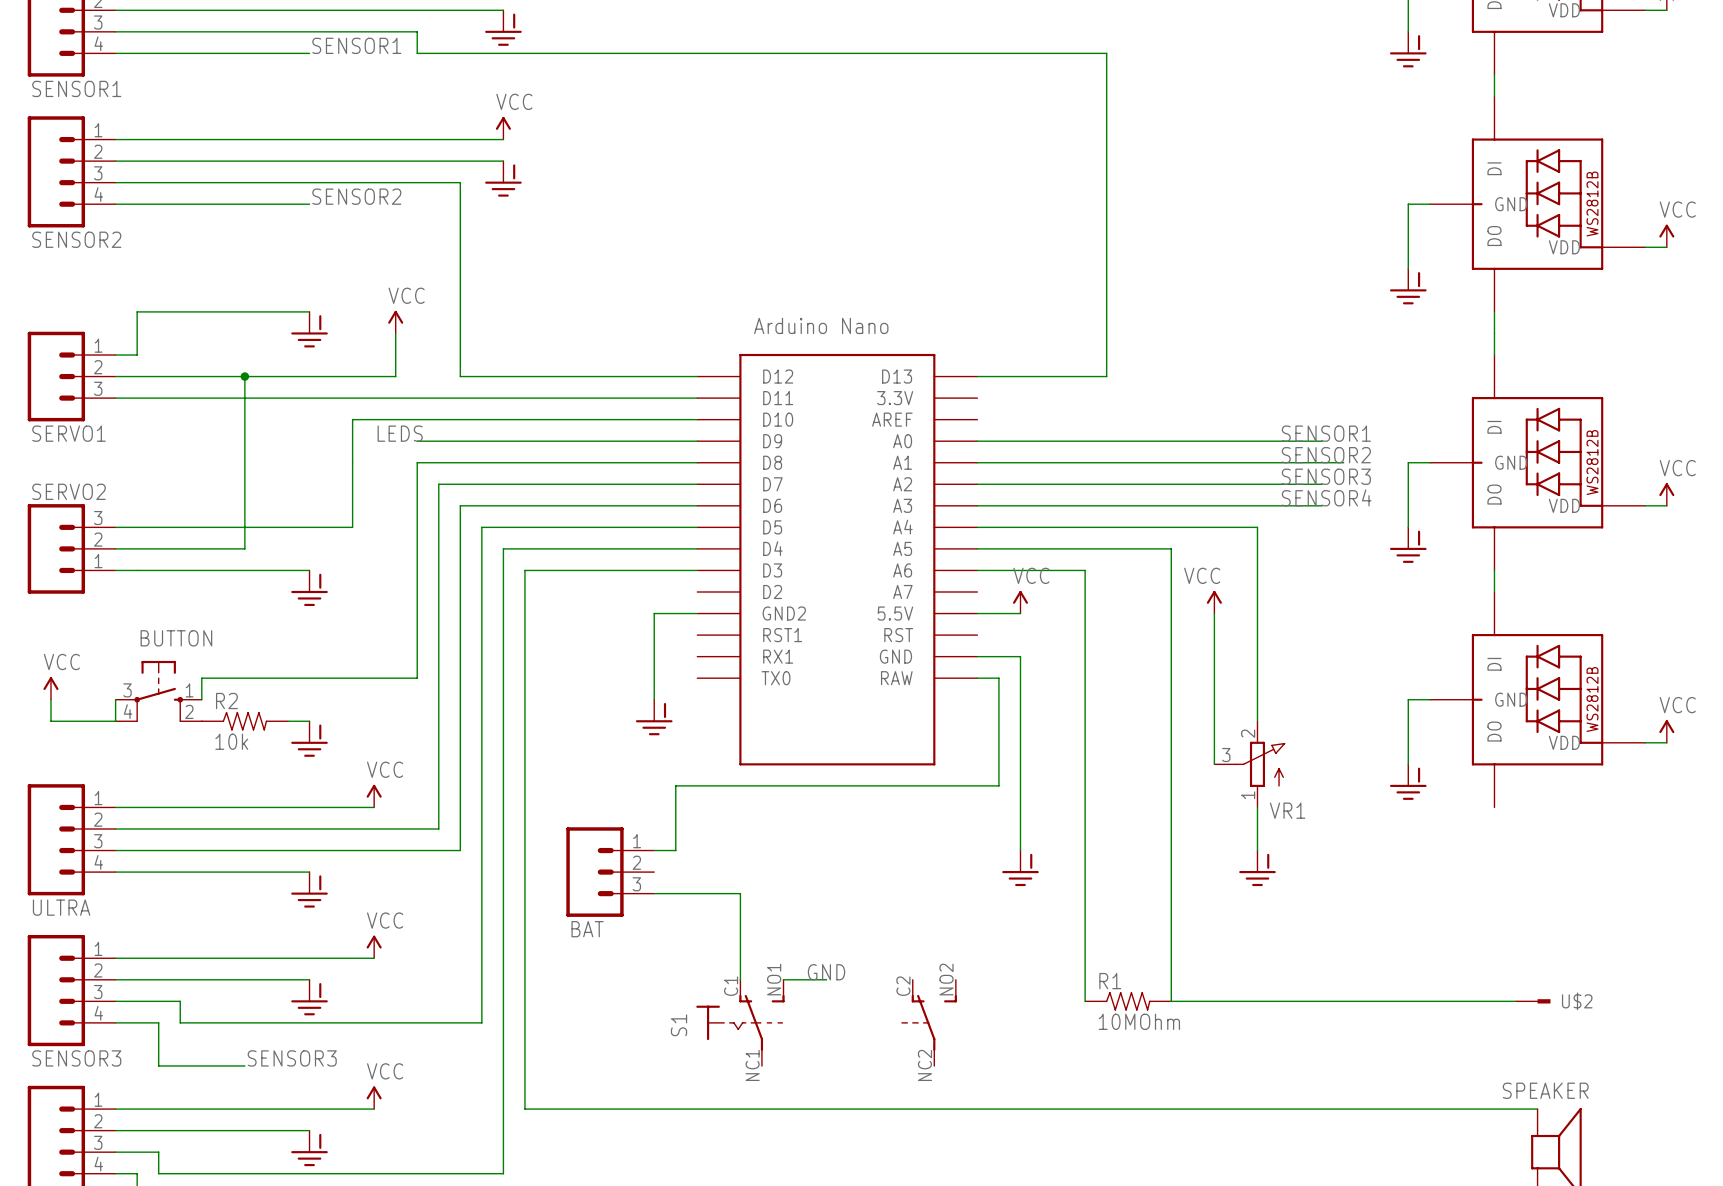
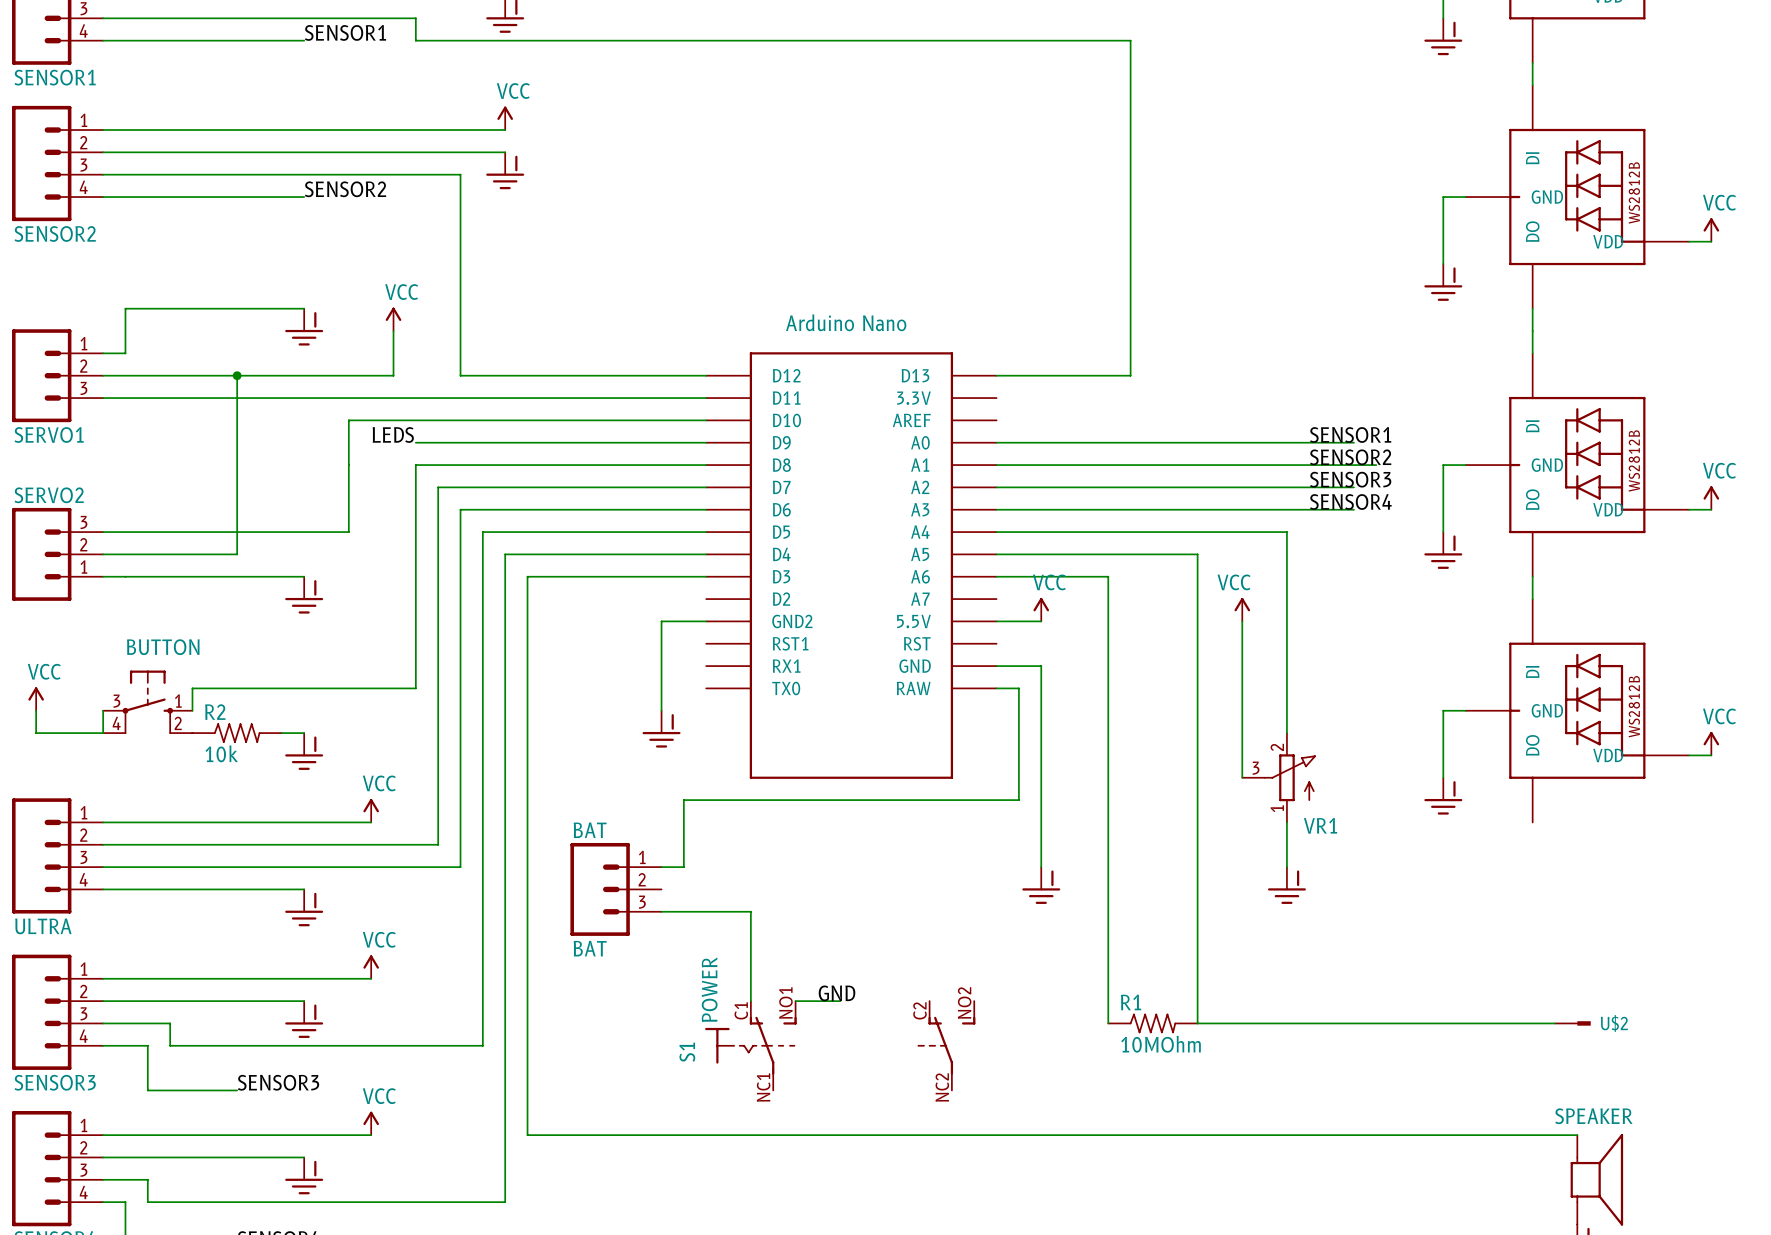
BAT value: none -> BAT (590, 830)
S1 value: none -> POWER (709, 989)

